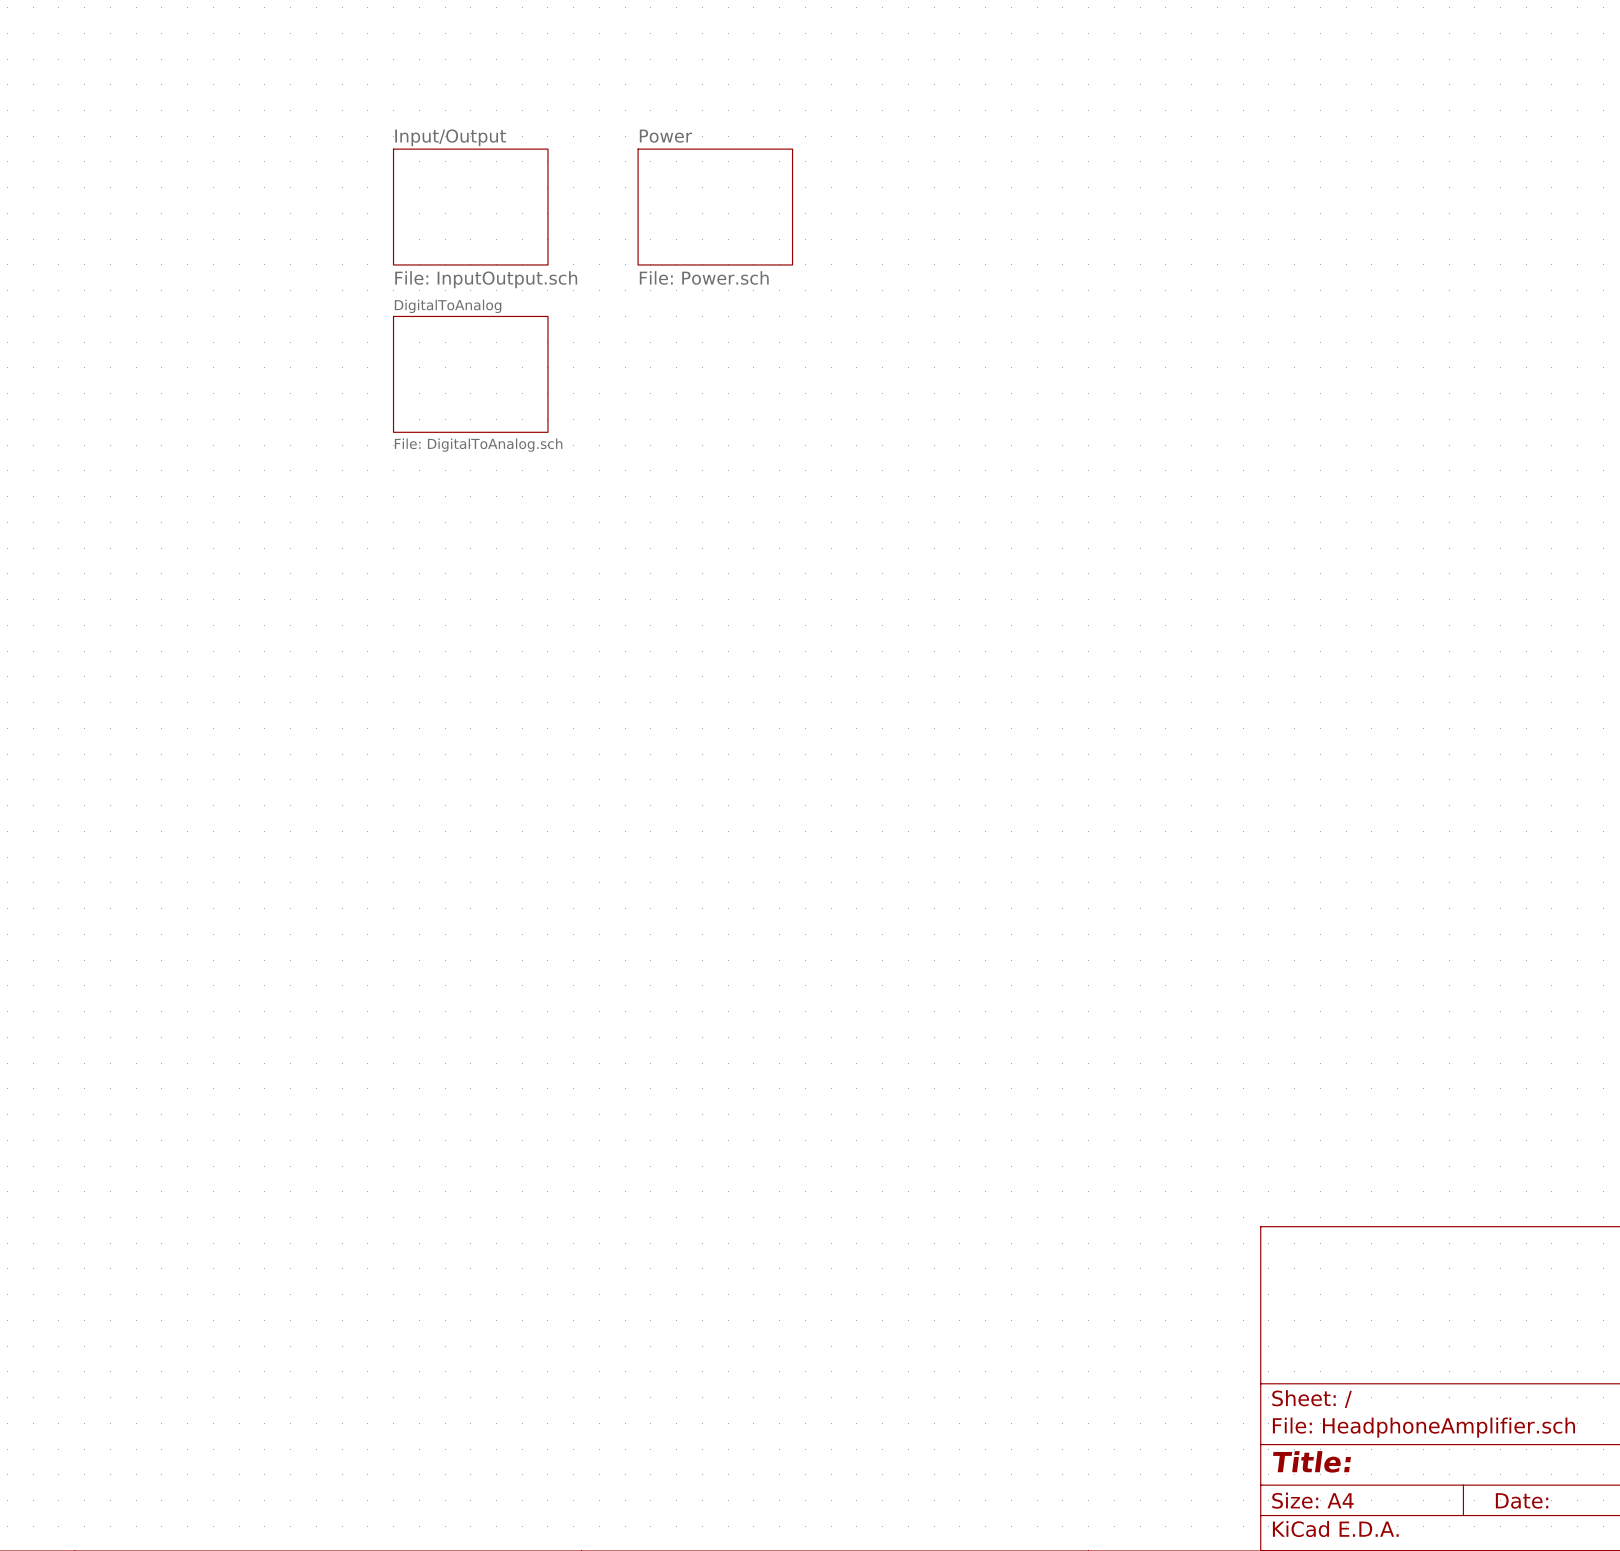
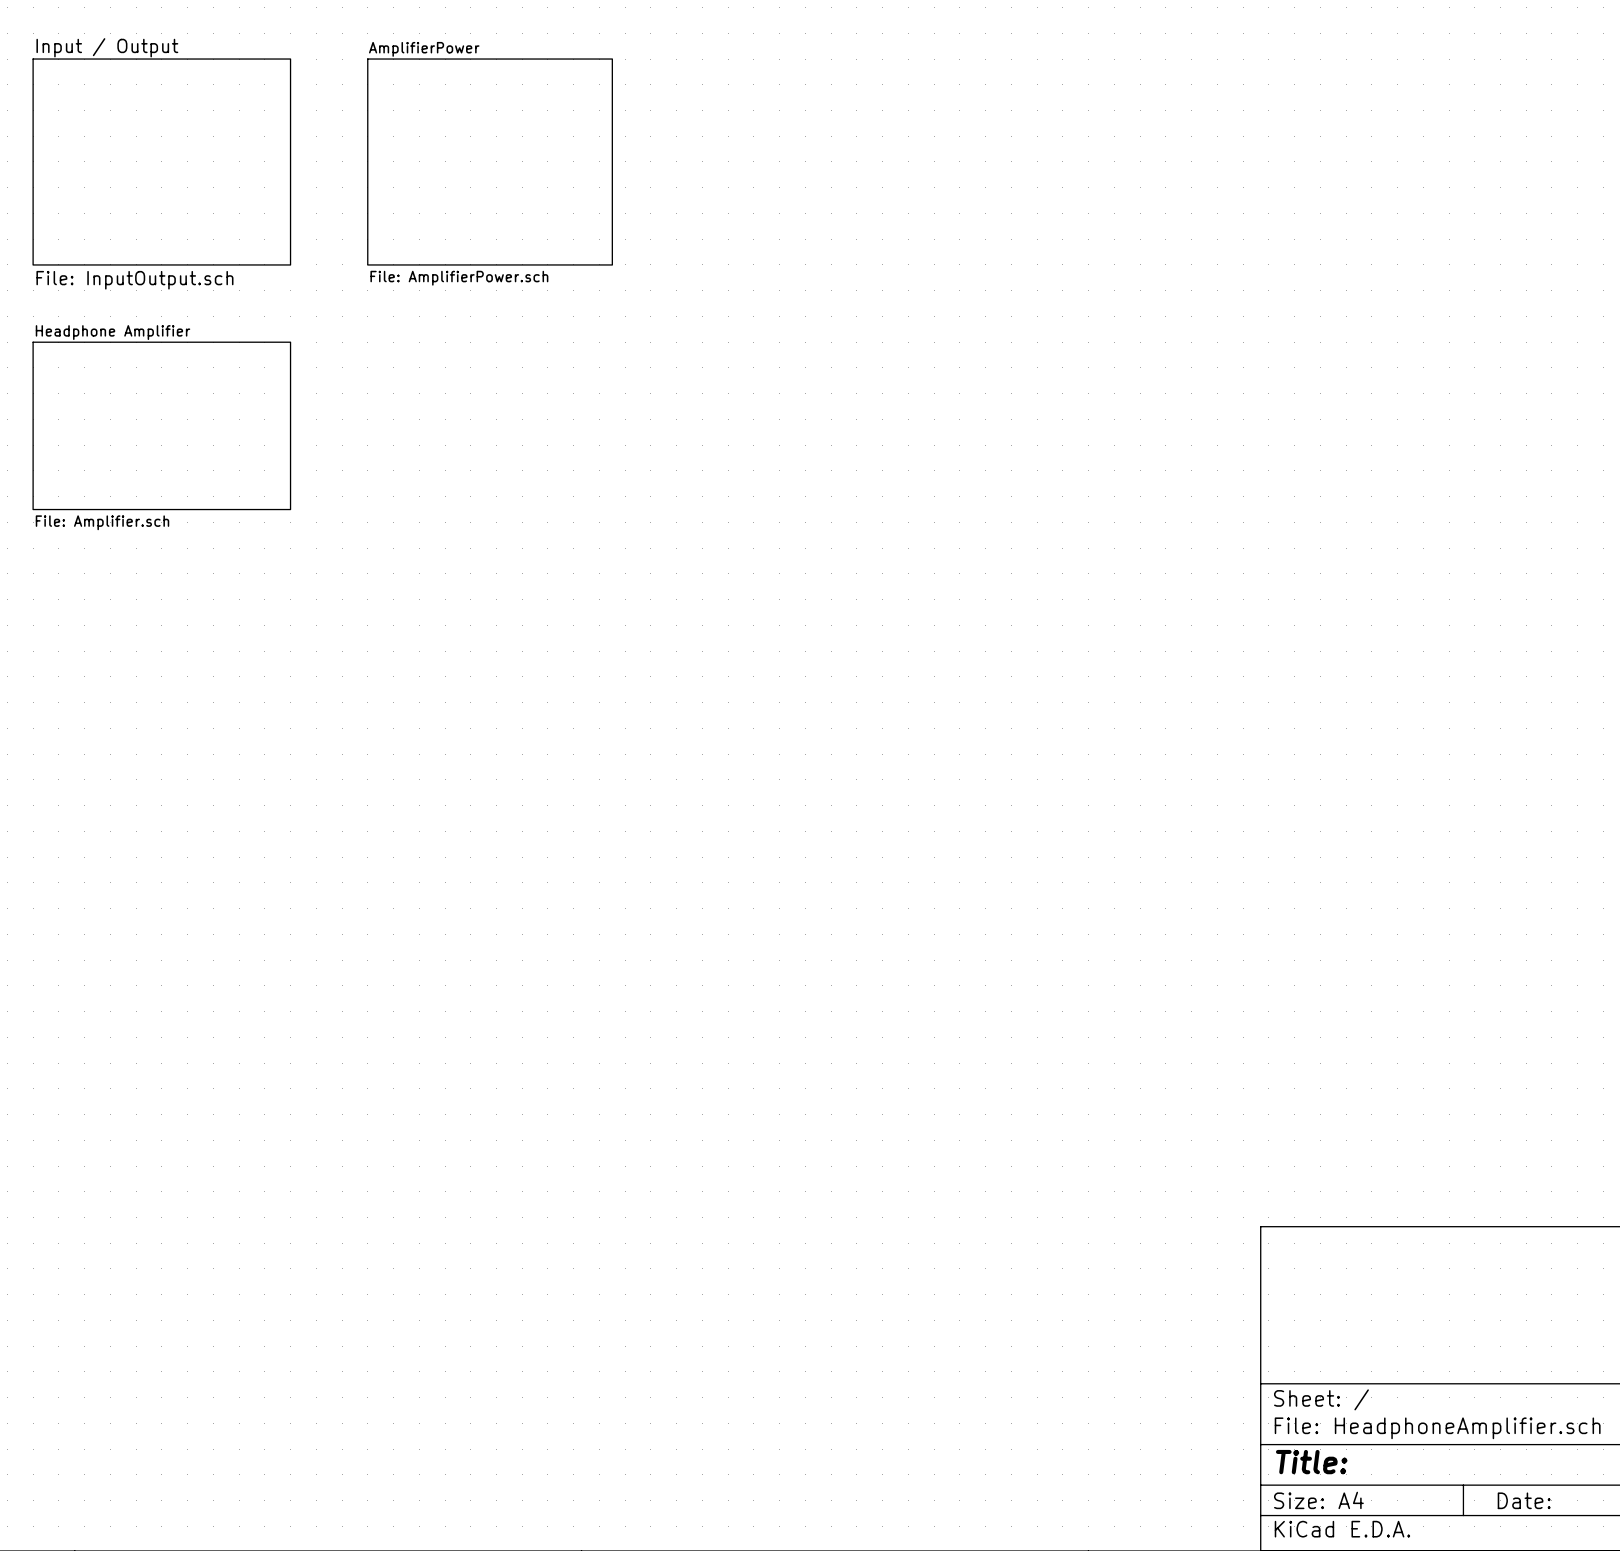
sheet Input / Output: none -> File: InputOutput.sch (161, 161)
sheet AmplifierPower: none -> File: AmplifierPower.sch (490, 161)
sheet Input/Output: File: InputOutput.sch (470, 207) -> none
sheet Power: File: Power.sch (715, 207) -> none
sheet DigitalToAnalog: File: DigitalToAnalog.sch (470, 374) -> none
sheet Headphone Amplifier: none -> File: Amplifier.sch (161, 425)

